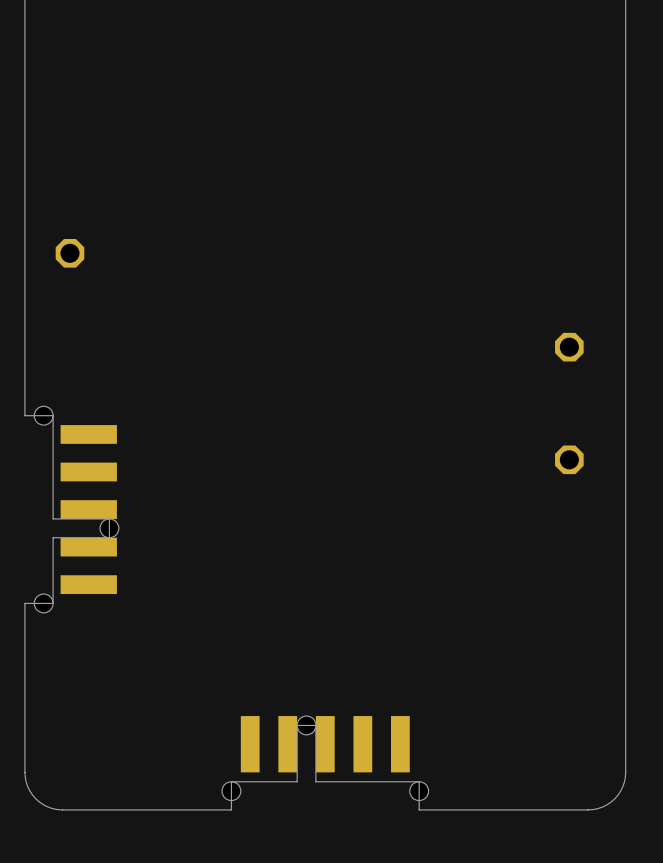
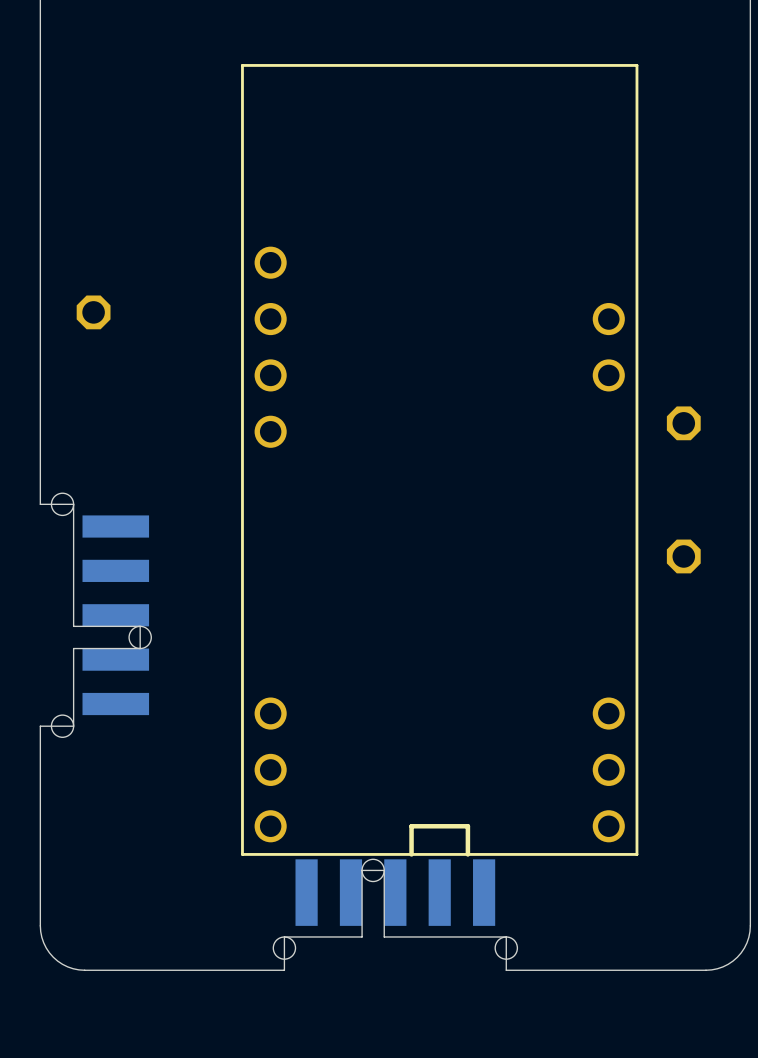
part: none -> (439, 460)

